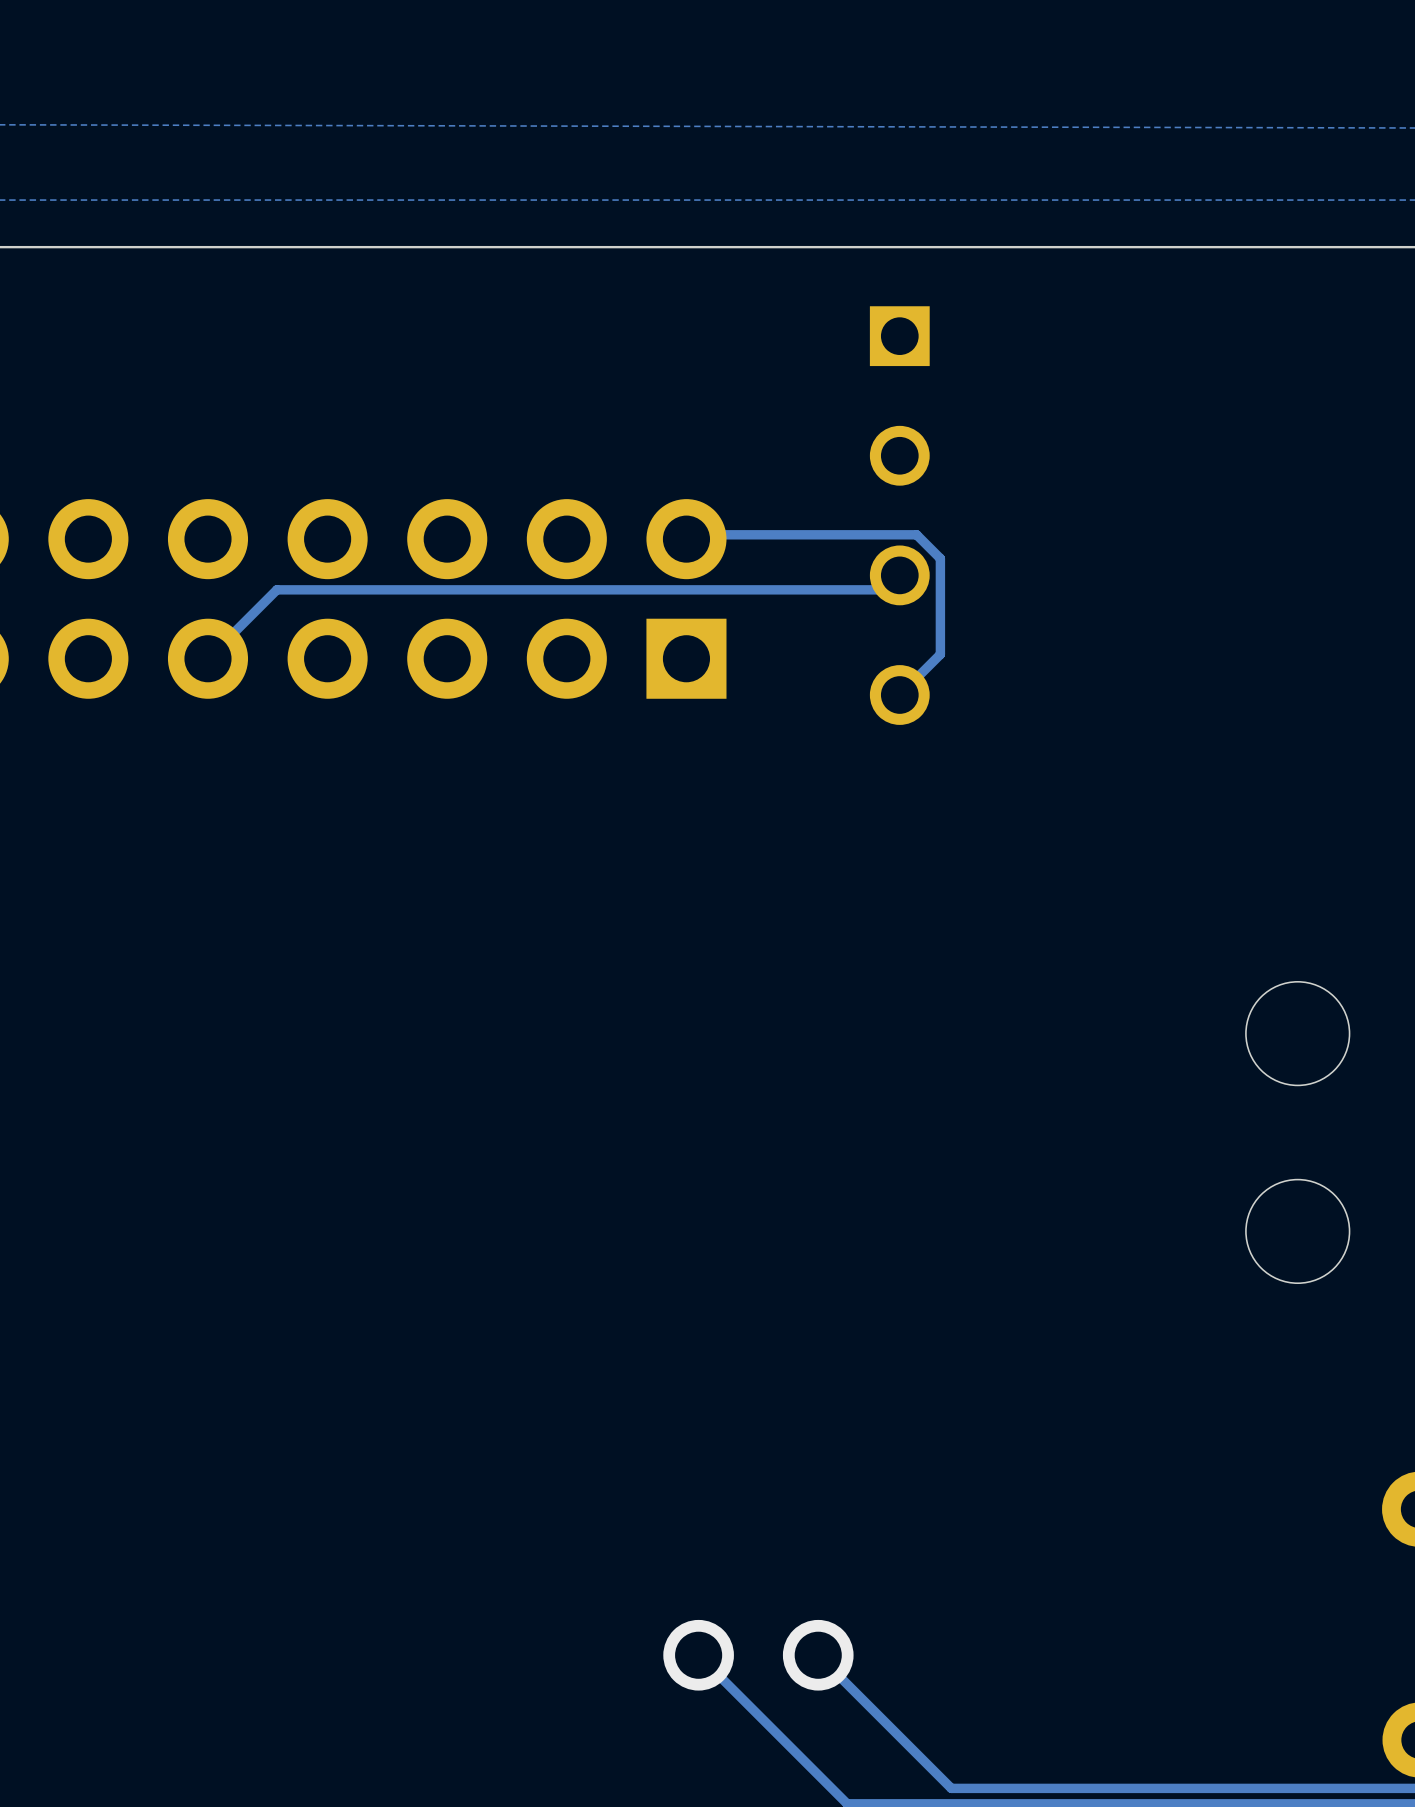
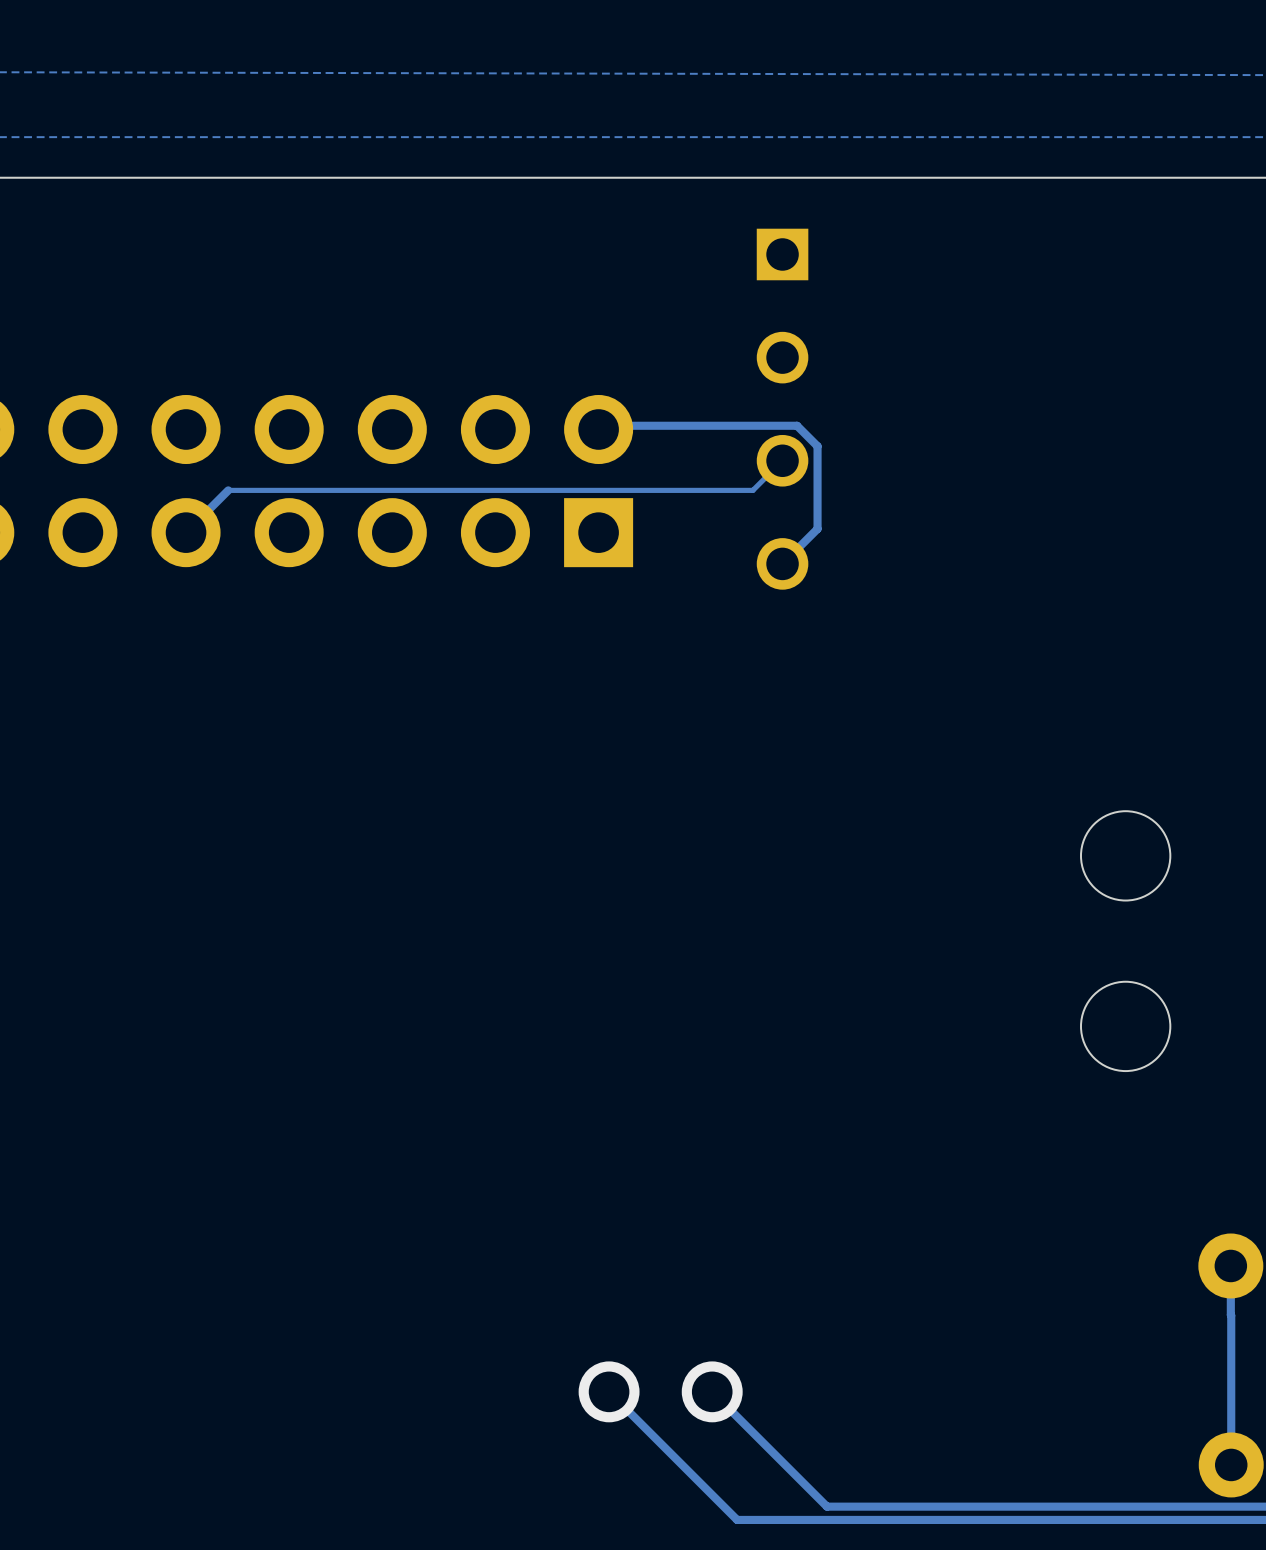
track: (885, 589) (276, 589) (256, 609) -> (782, 460) (752, 490) (228, 490)

